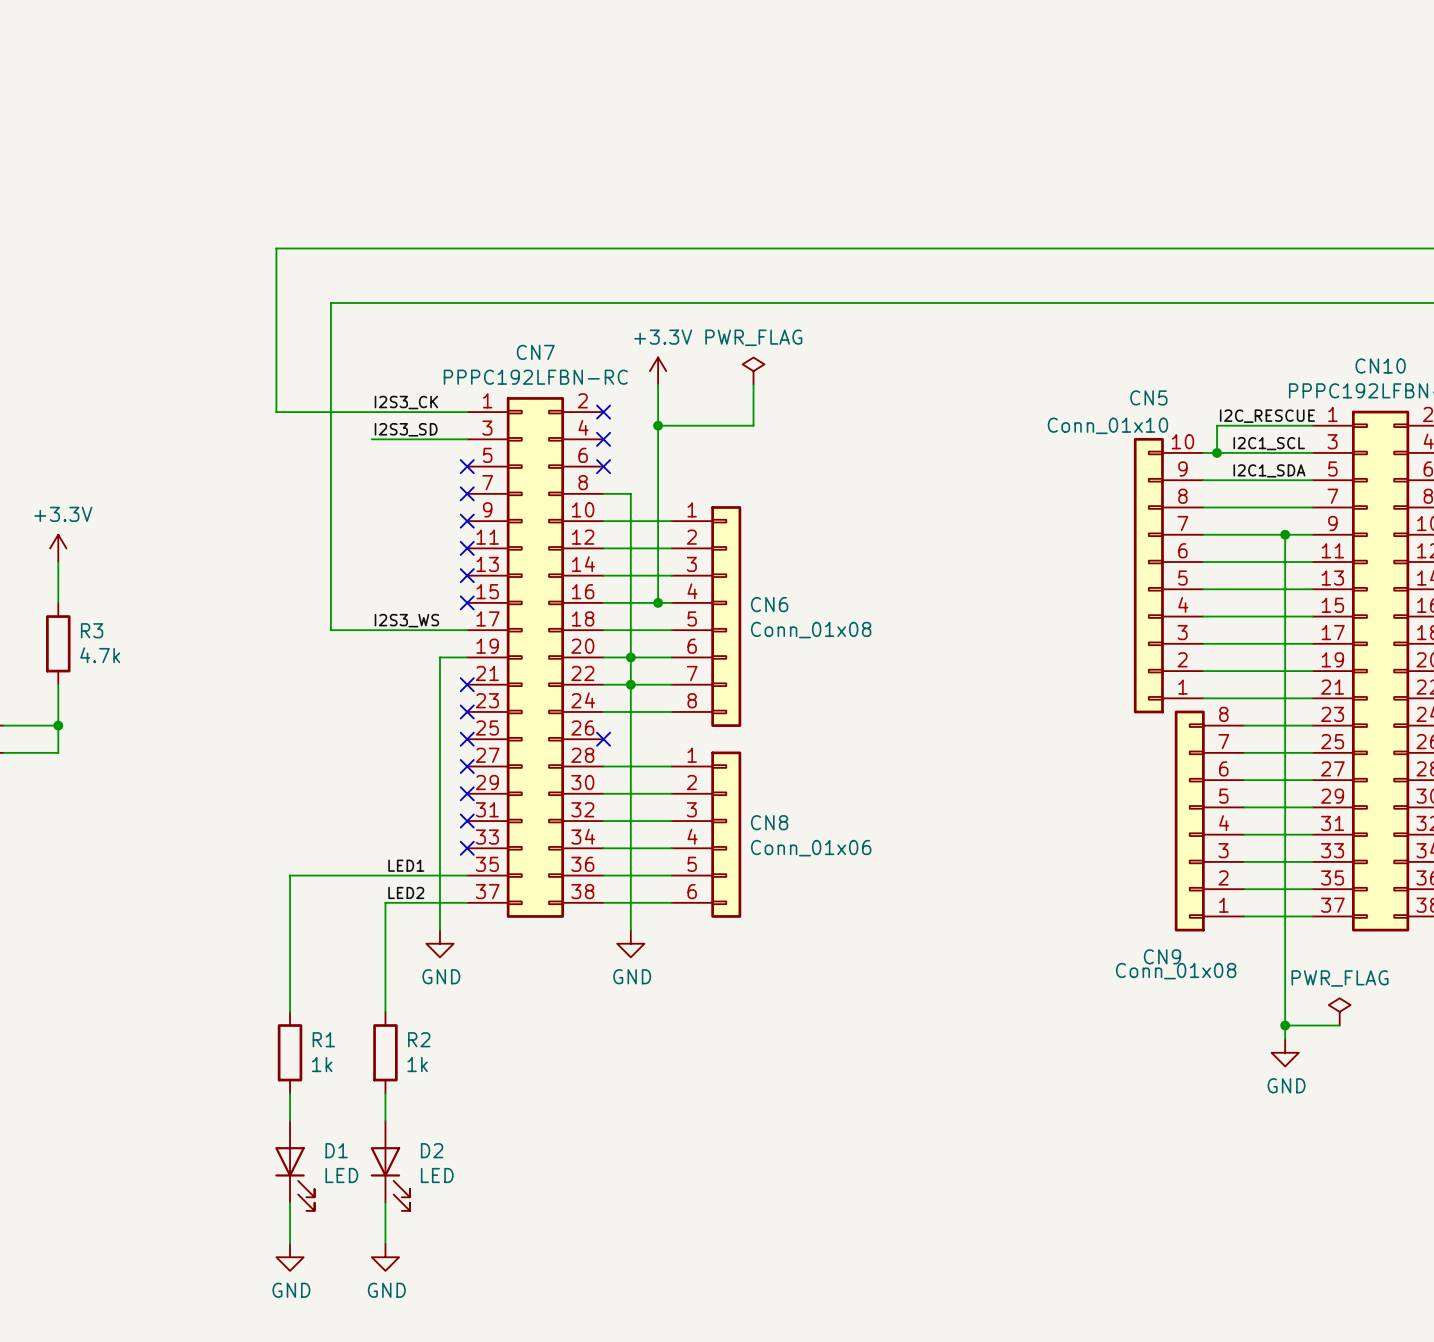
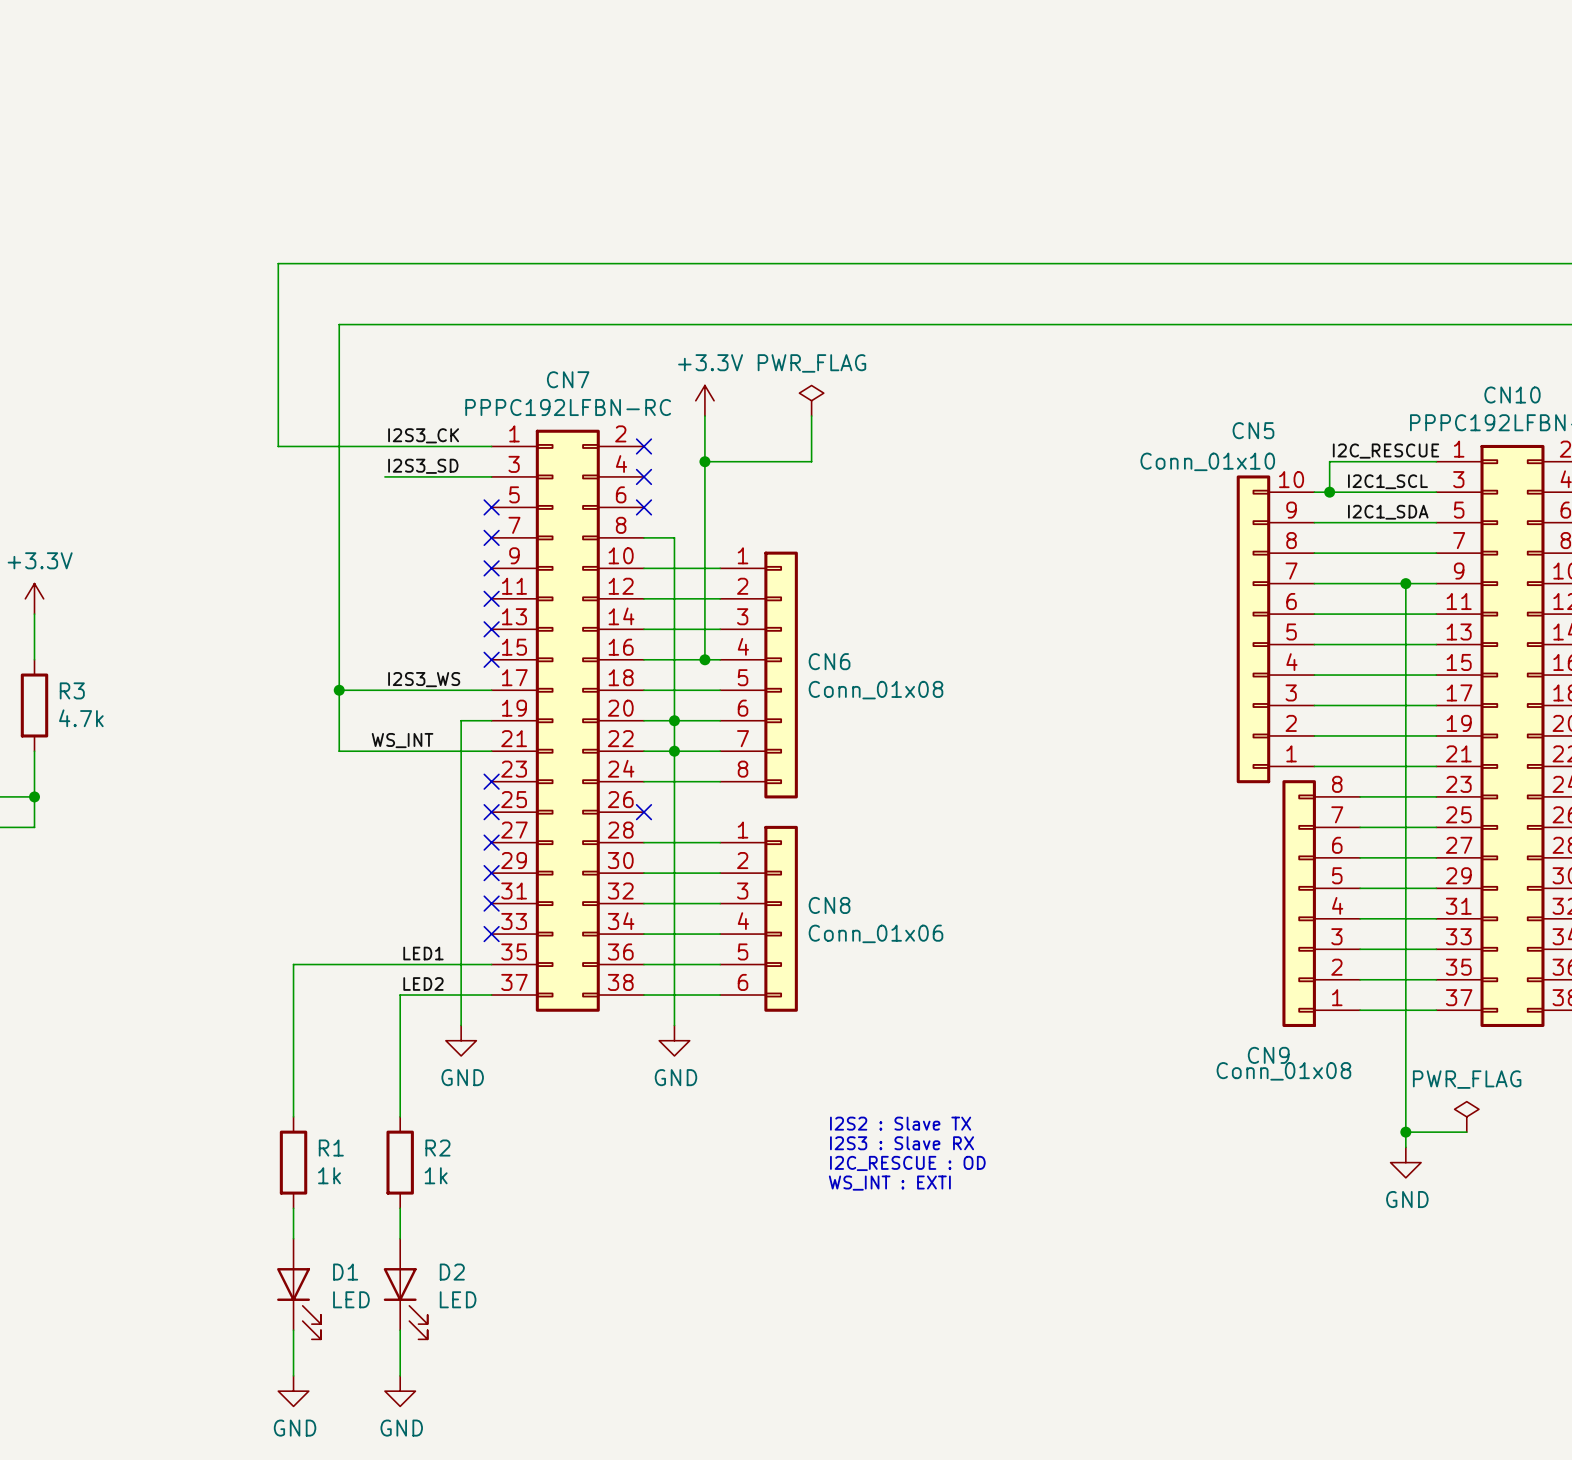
wire: none -> (339, 690) (339, 751) (491, 751)
junction: none -> (339, 690)
label: none -> WS_INT (402, 740)
no-connect mark: (467, 684) -> none
text: none -> I2S2 : Slave TX (900, 1123)
text: none -> I2S3 : Slave RX (902, 1143)
text: none -> I2C_RESCUE : OD (907, 1163)
text: none -> WS_INT : EXTI (889, 1183)

